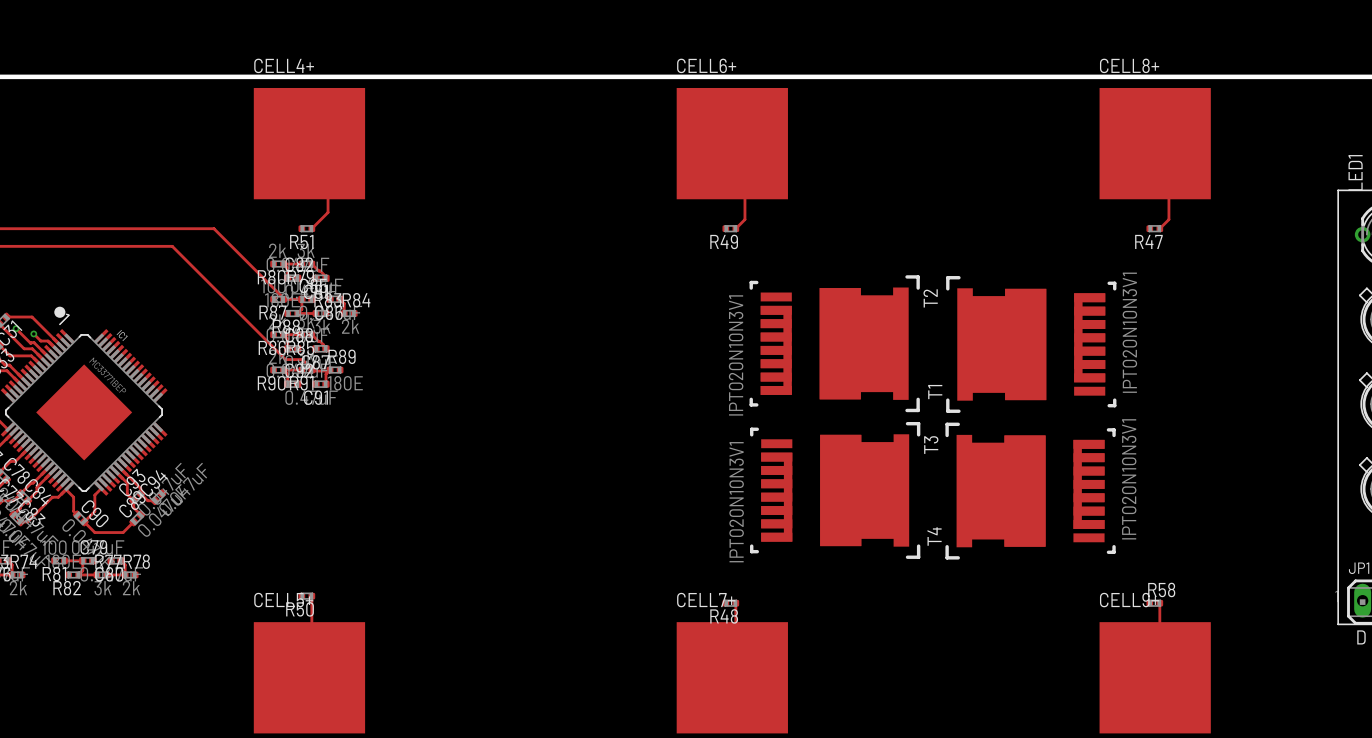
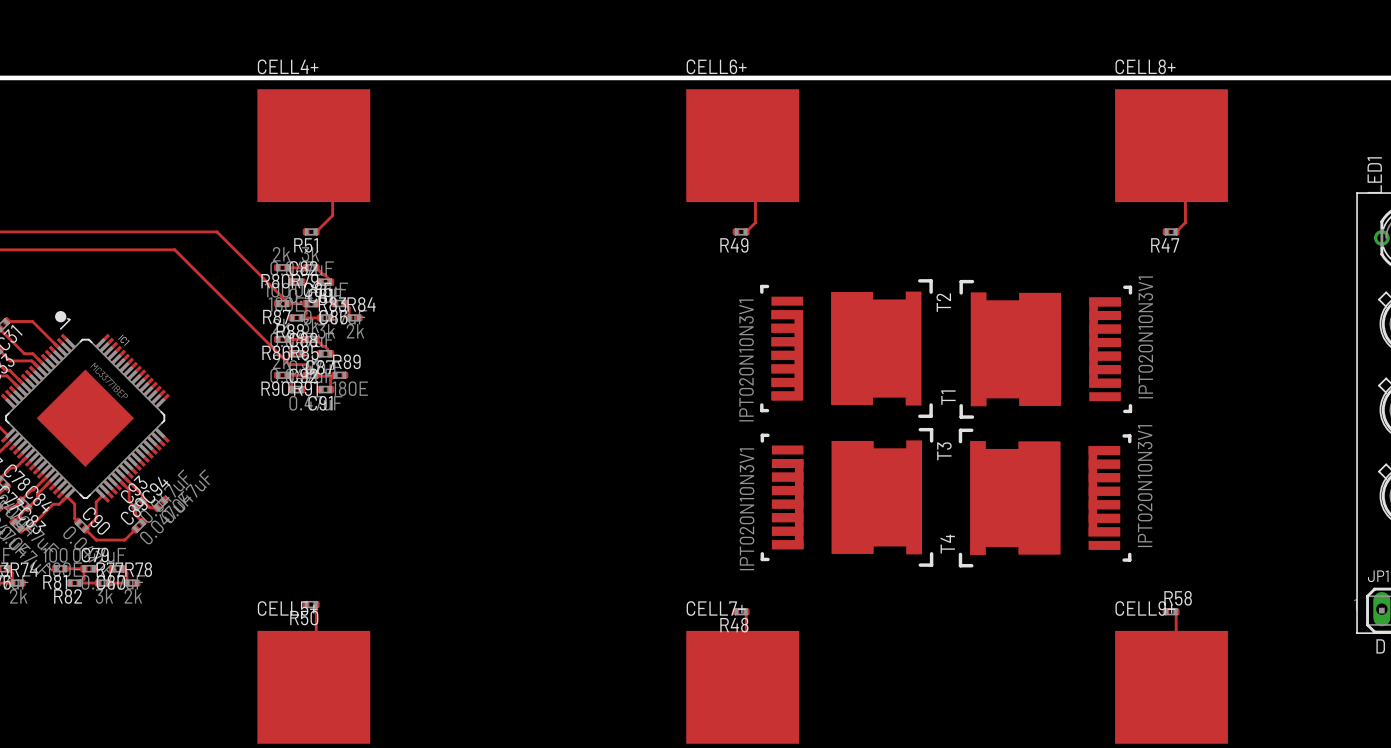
track: (16, 328) (47, 355) -> none
via: (16, 328) -> none
track: (33, 333) (40, 341) (48, 341) (55, 348) -> none
via: (33, 333) -> none

